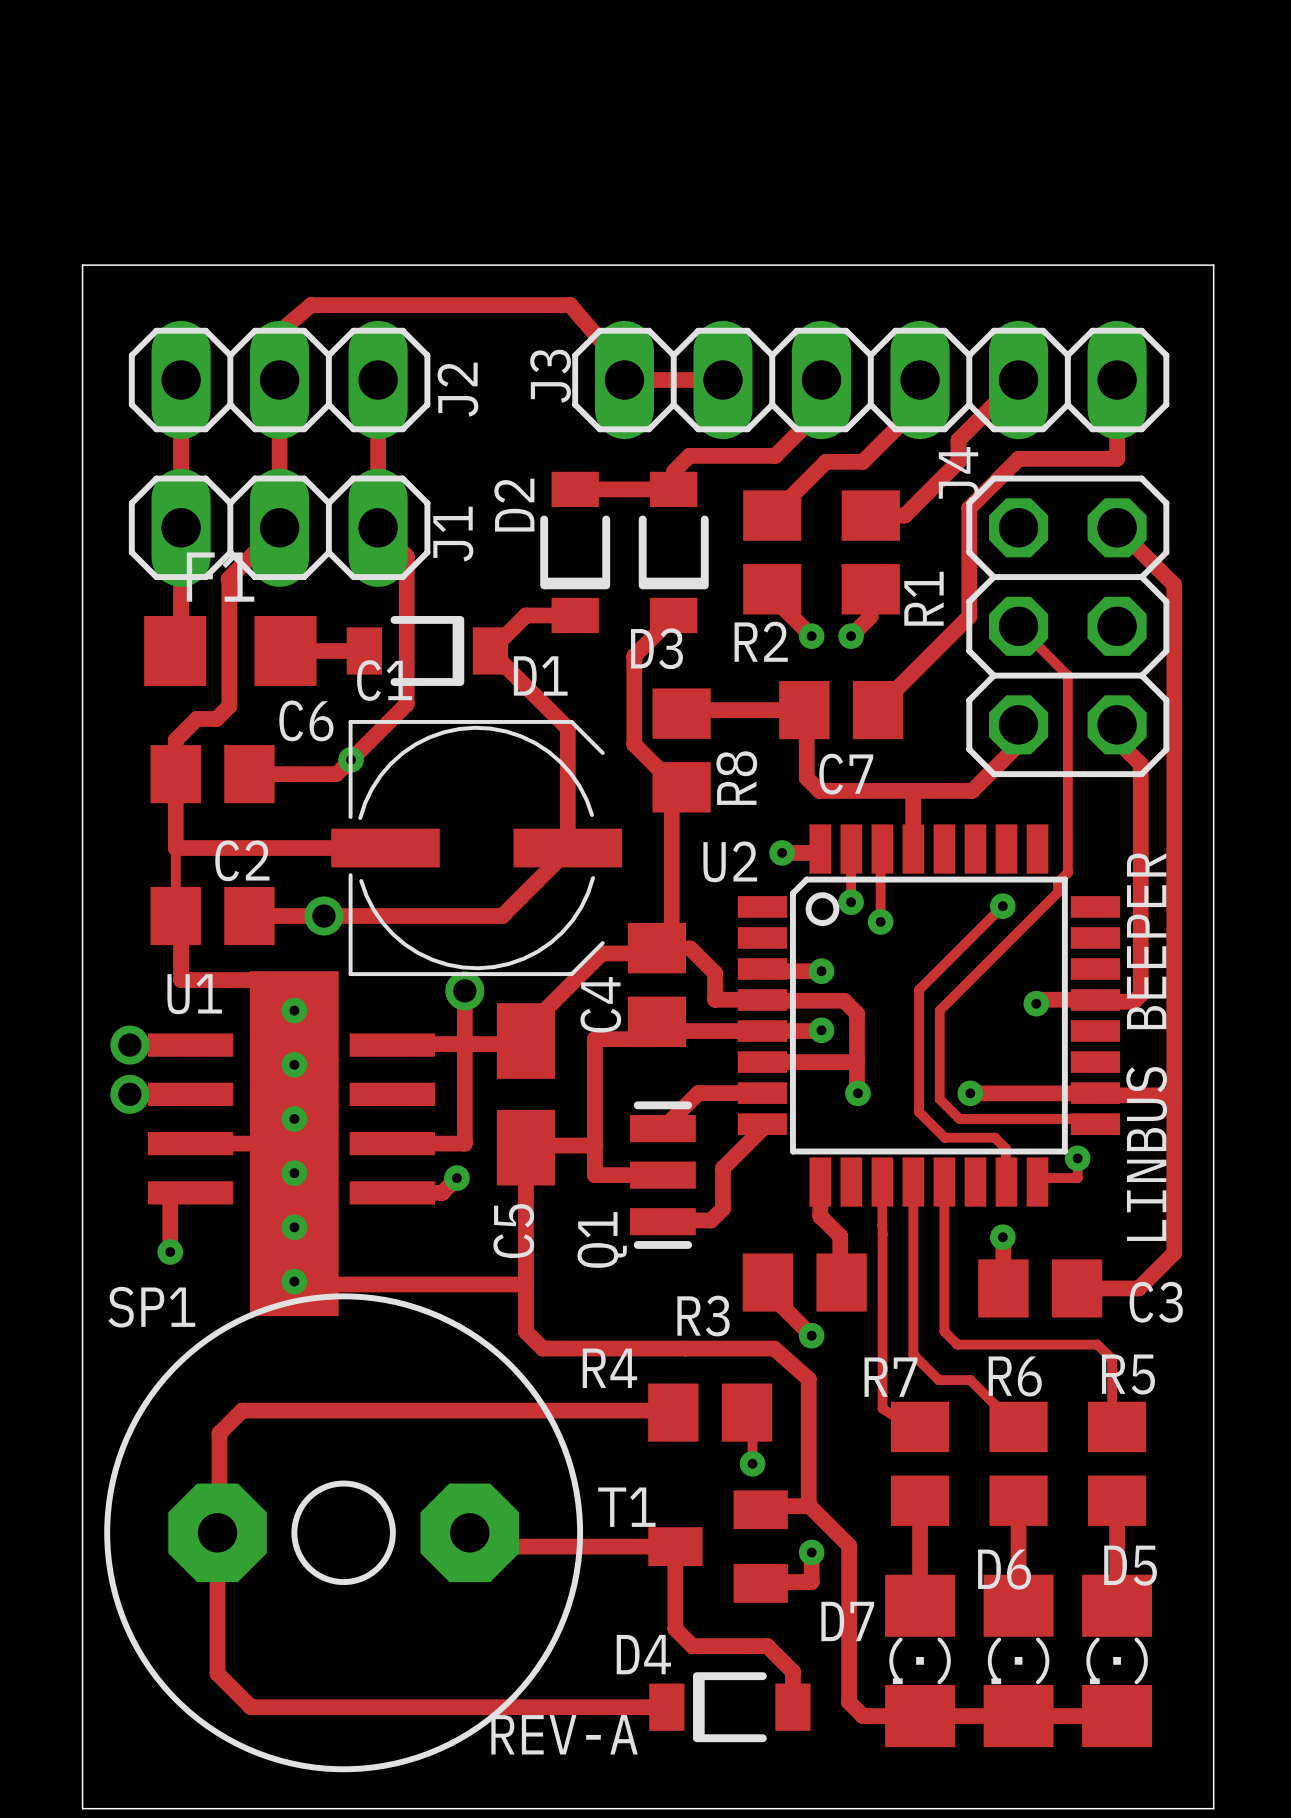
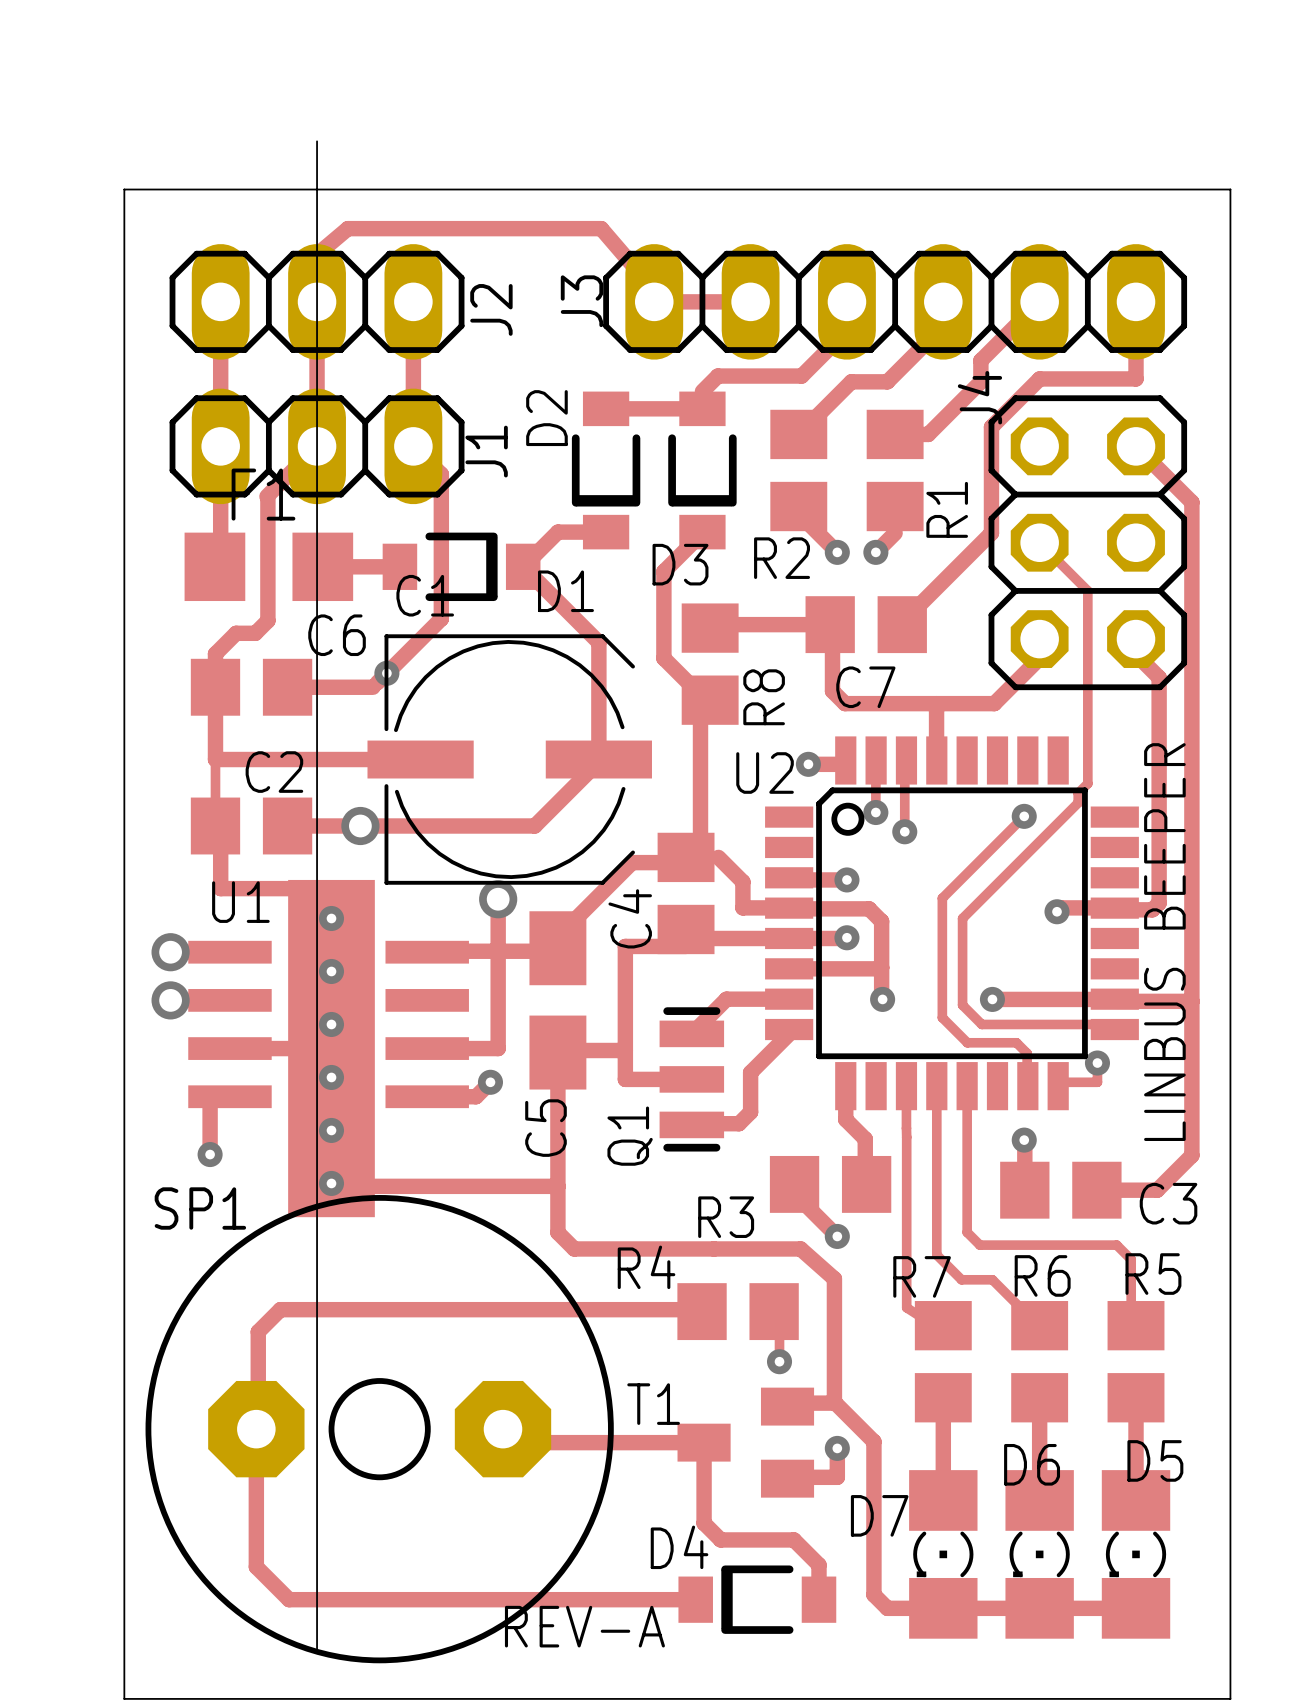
board edge: none -> (317, 141) (317, 1650)

